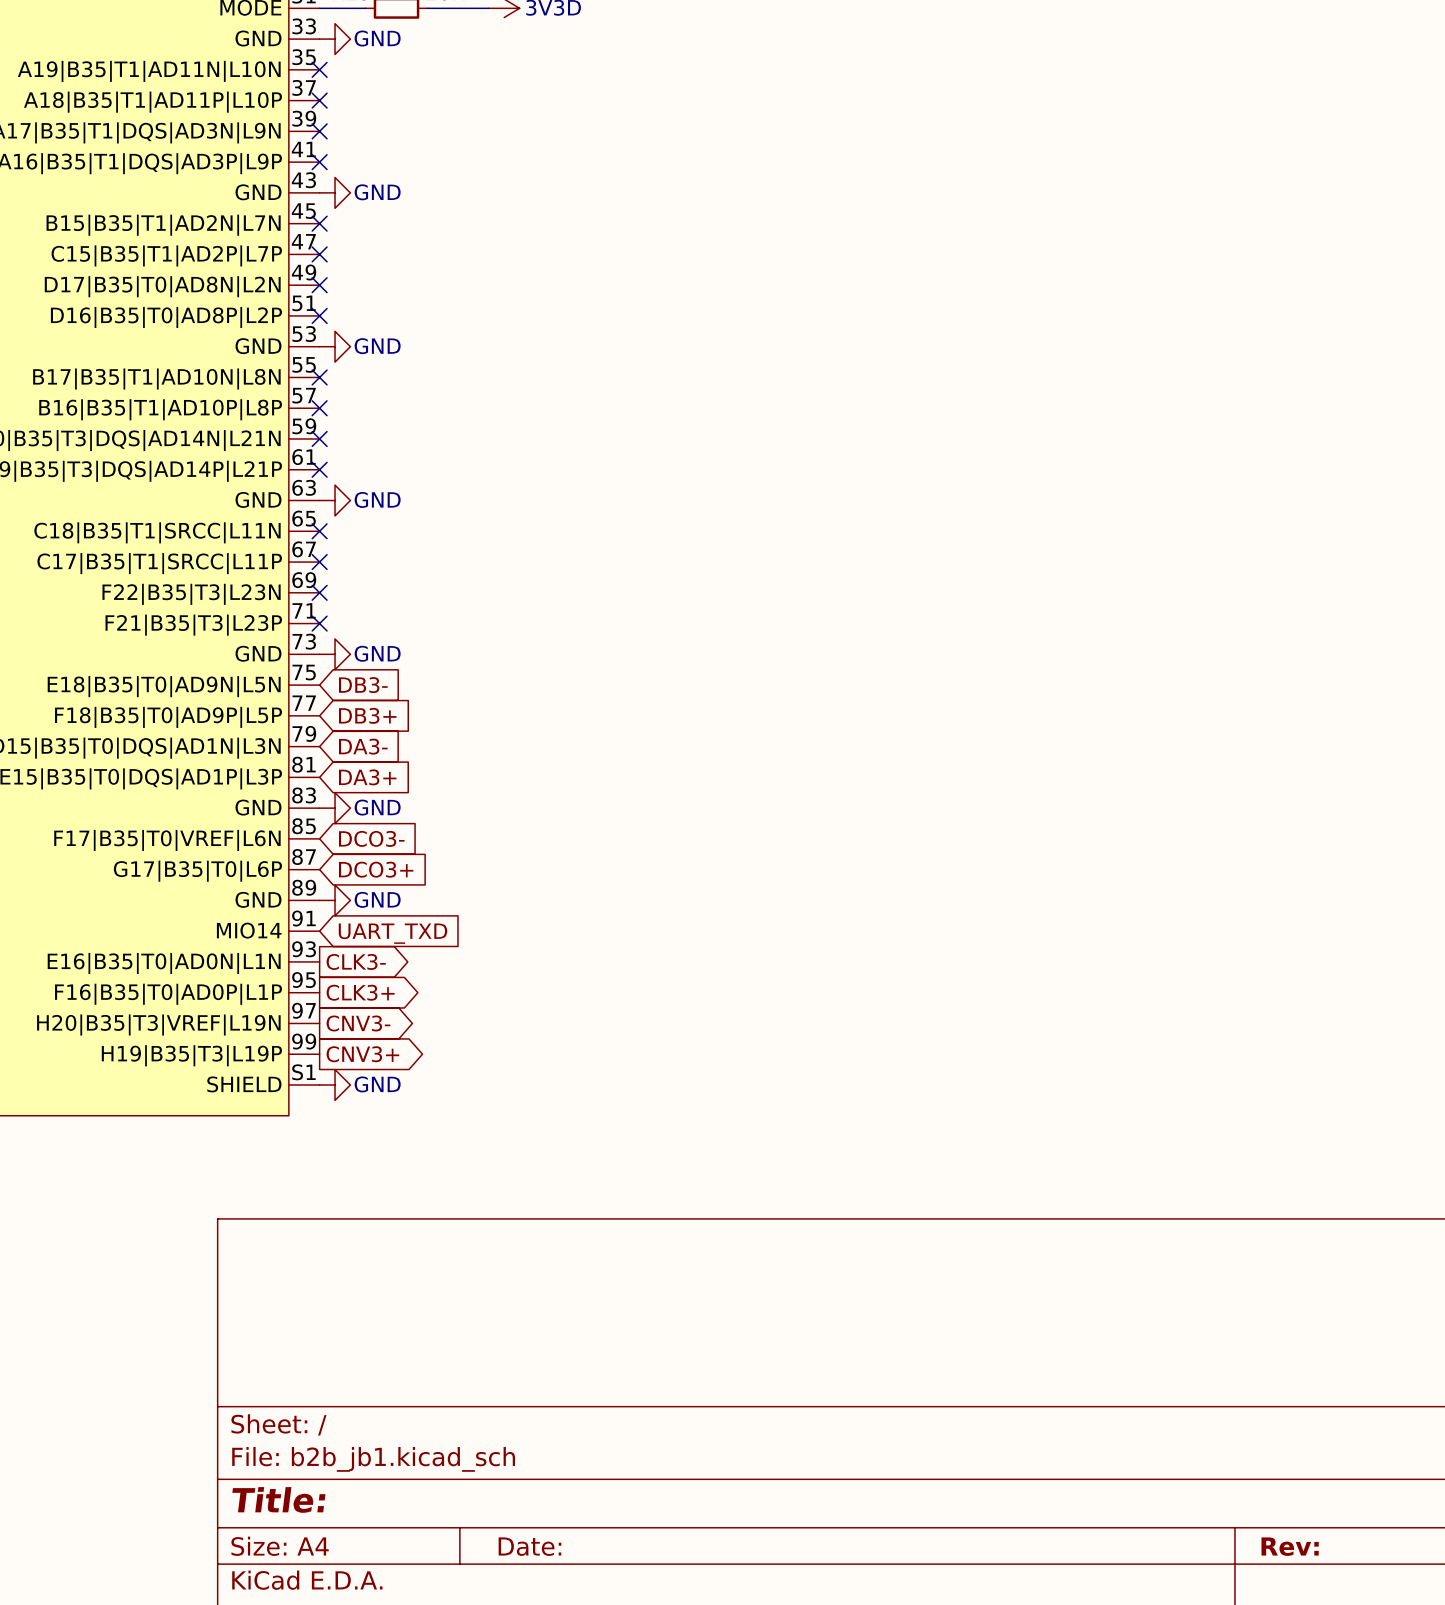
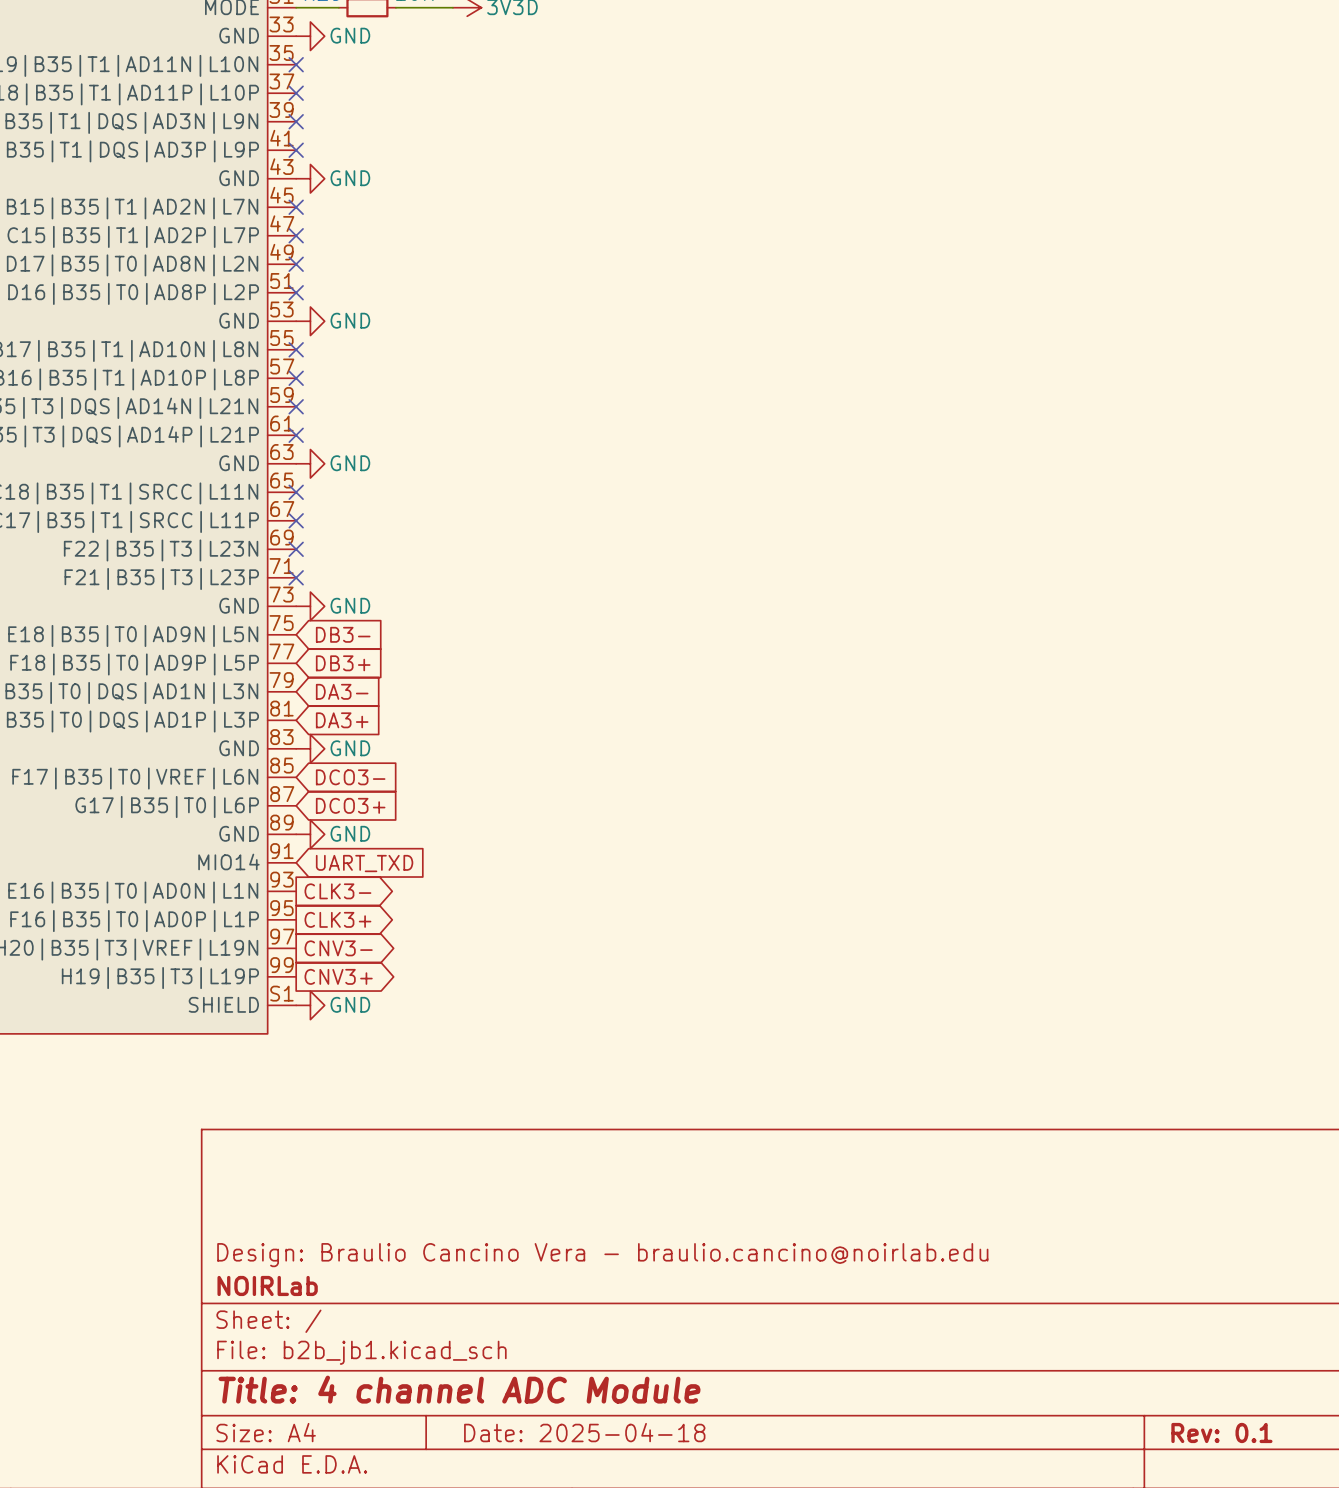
title block: none -> Design: Braulio Cancino Vera - braulio.cancino@noirlab.edu (602, 1255)
title block: none -> NOIRLab (267, 1285)
title block: Title: (278, 1499) -> Title: 4 channel ADC Module (459, 1389)
title block: Date: (529, 1546) -> Date: 2025-04-18 (584, 1432)
title block: Rev: (1290, 1546) -> Rev: 0.1 (1221, 1432)

